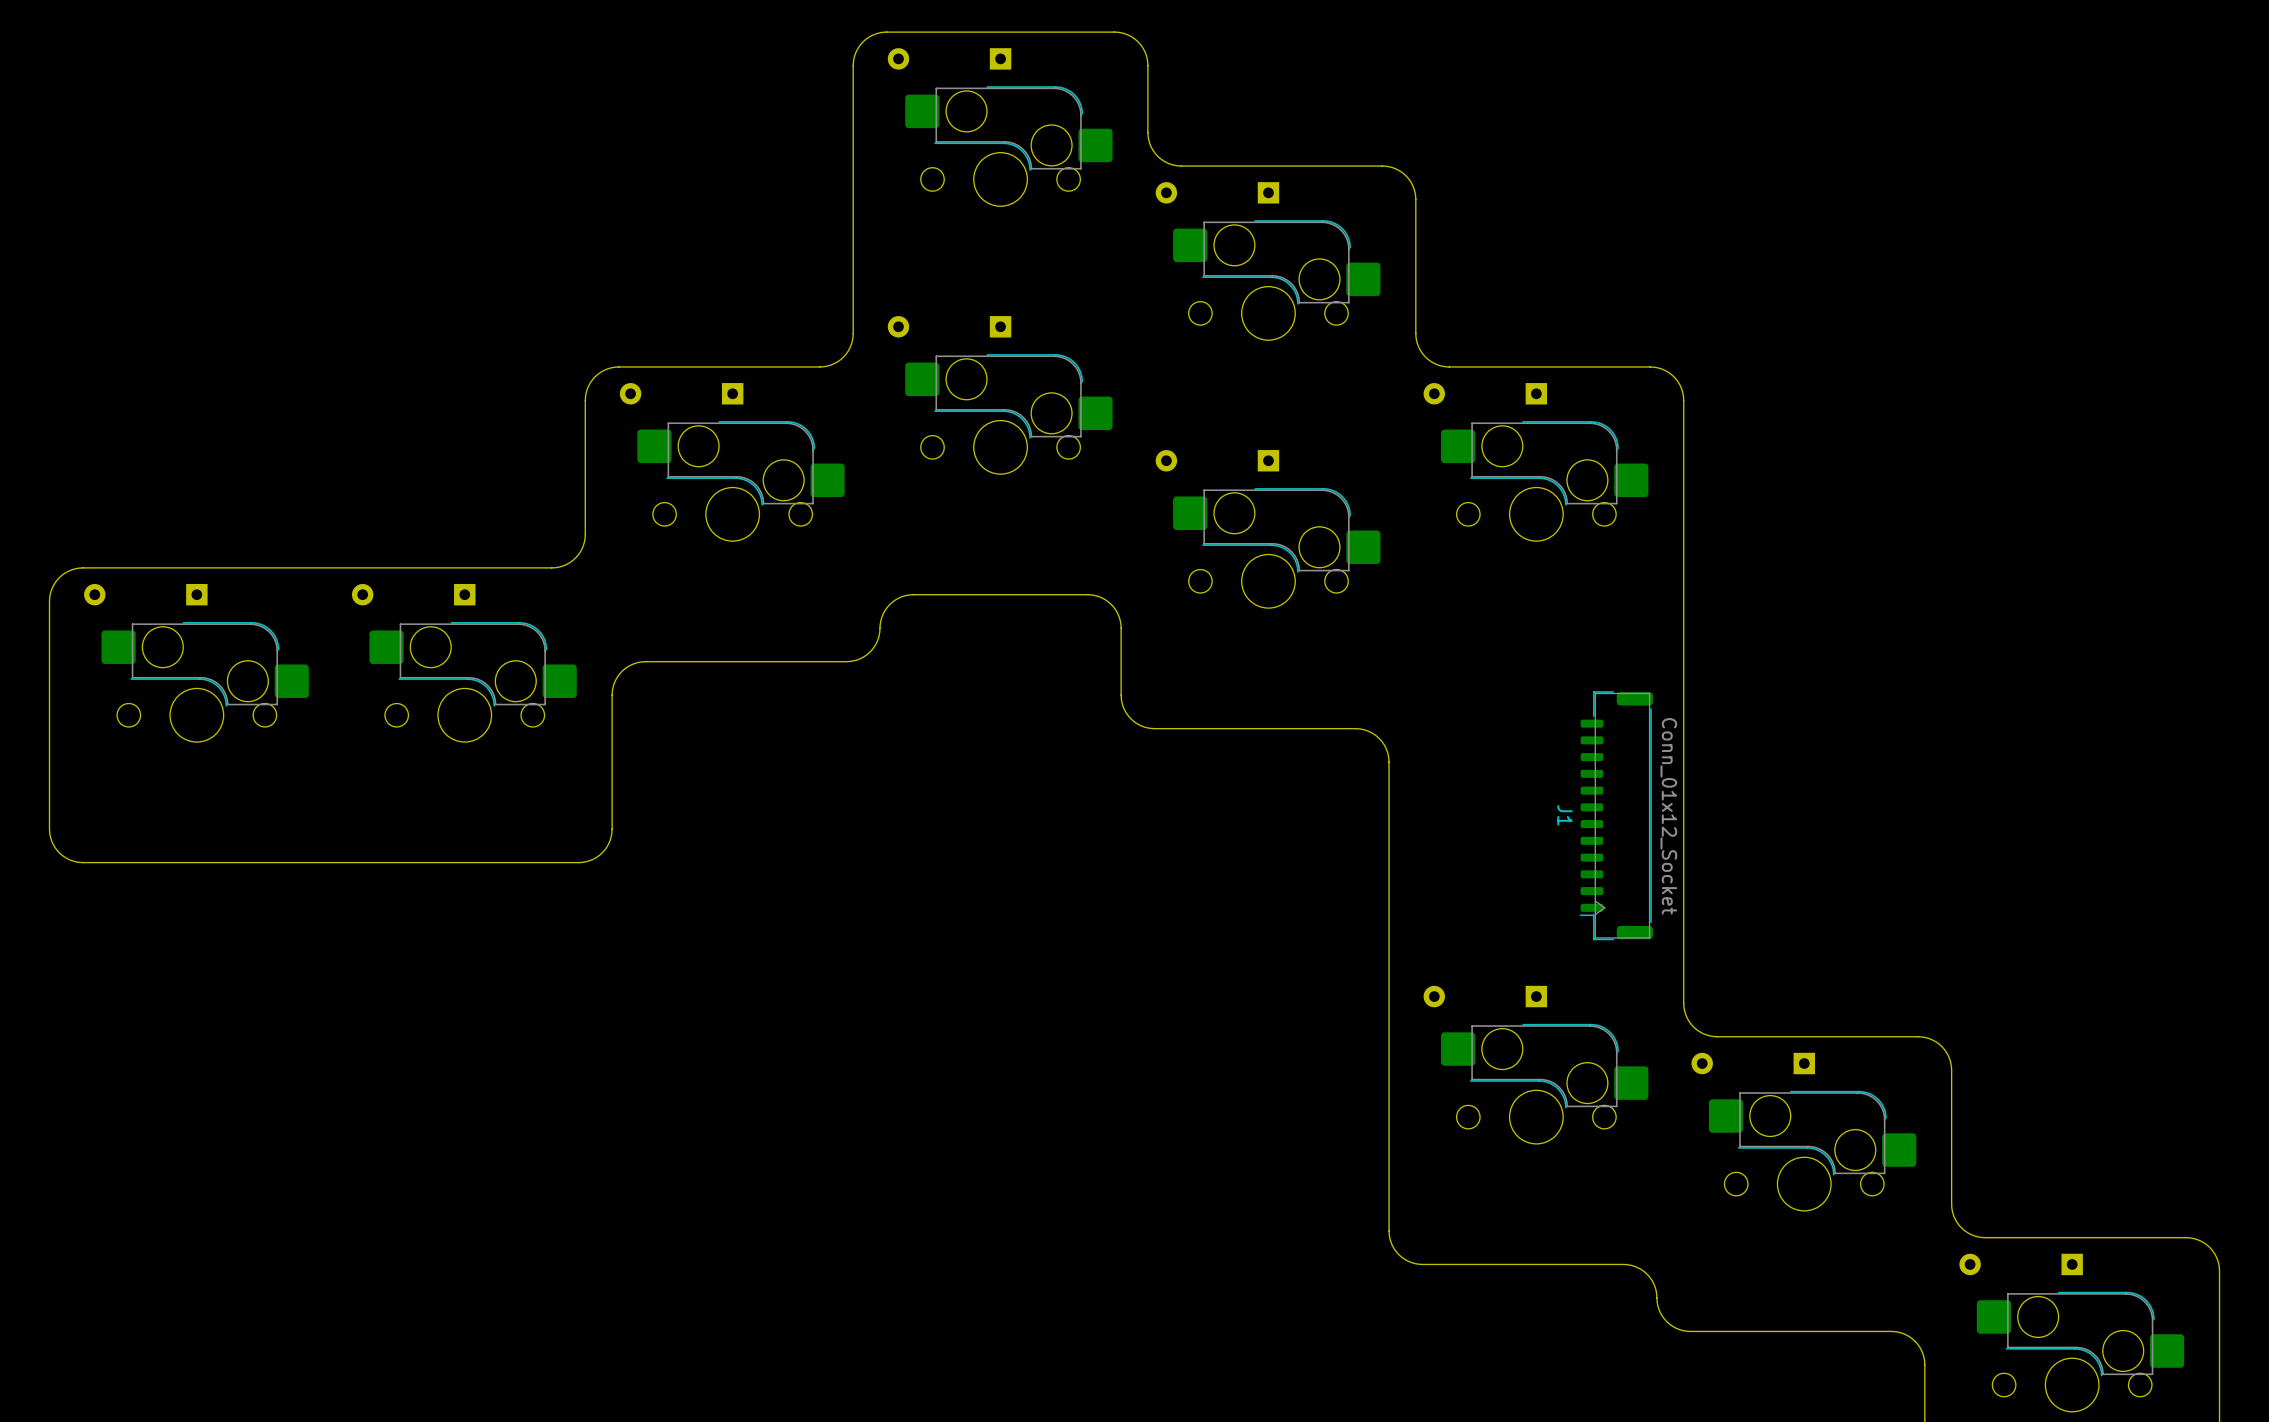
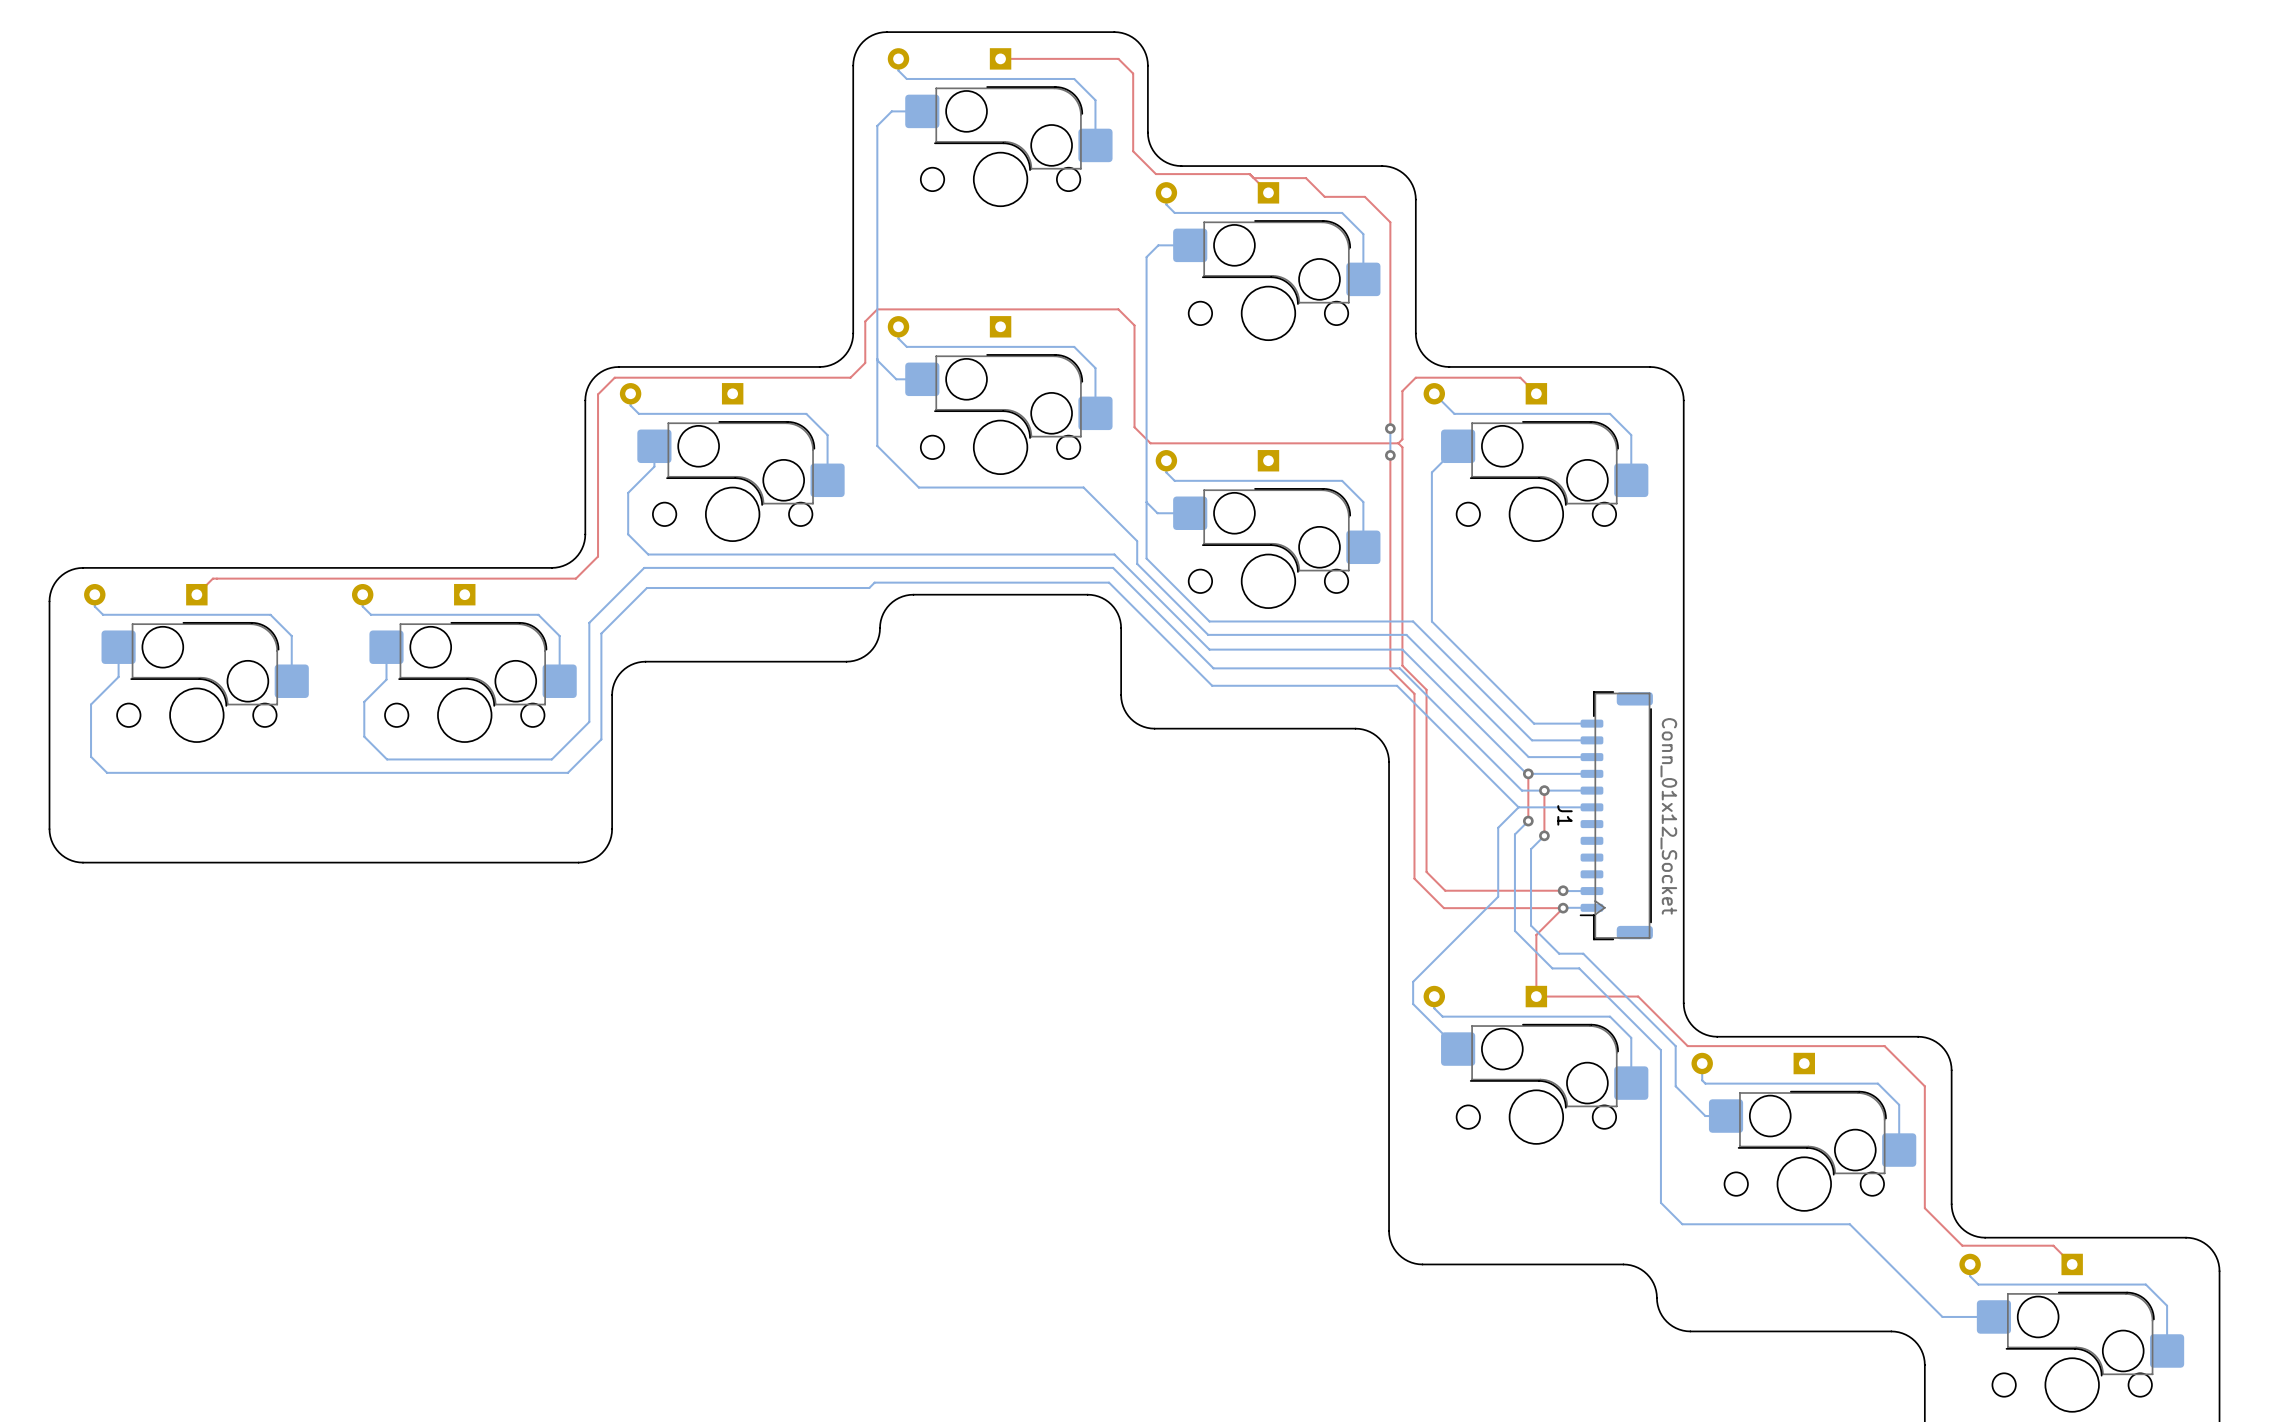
bottom track: none -> (898, 58) (898, 70) (906, 78) (1074, 78) (1095, 100) (1095, 145)
top track: none -> (1000, 58) (1118, 58) (1133, 73) (1133, 151) (1155, 174) (1249, 174) (1268, 192)
bottom track: none -> (922, 111) (891, 111) (877, 125) (877, 446) (918, 487) (1083, 487) (1137, 541) (1137, 563) (1208, 634) (1406, 634) (1528, 757) (1591, 757)
top track: none -> (1253, 178) (1305, 178) (1324, 196) (1364, 196) (1390, 222) (1390, 428)
bottom track: none -> (1166, 192) (1166, 204) (1174, 212) (1342, 212) (1363, 234) (1363, 279)
bottom track: none -> (1190, 245) (1158, 245) (1146, 257) (1146, 558) (1209, 621) (1413, 621) (1532, 740) (1591, 740)
bottom track: none -> (898, 326) (898, 338) (906, 346) (1074, 346) (1095, 368) (1095, 413)
bottom track: none -> (877, 360) (896, 379) (922, 379)
bottom track: none -> (630, 393) (630, 405) (638, 413) (806, 413) (827, 435) (827, 480)
bottom track: none -> (1434, 393) (1454, 413) (1610, 413) (1631, 435) (1631, 480)
top track: none -> (1536, 393) (1520, 377) (1415, 377) (1402, 391) (1402, 439) (1398, 443)
bottom track: none -> (1390, 428) (1390, 455)
via: none -> (1390, 428)
top track: none -> (1398, 443) (1402, 447) (1402, 665) (1426, 689) (1426, 871) (1445, 890) (1563, 890)
top track: none -> (1398, 443) (1150, 443) (1134, 427) (1134, 325) (1118, 309) (877, 309) (865, 321) (865, 362) (850, 377) (614, 377) (598, 394) (598, 556) (575, 578) (212, 578) (196, 594)
bottom track: none -> (654, 446) (654, 466) (628, 492) (628, 534) (648, 554) (1114, 554) (1209, 649) (1402, 649) (1526, 773) (1591, 773)
bottom track: none -> (1458, 446) (1431, 472) (1431, 621) (1534, 723) (1591, 723)
top track: none -> (1390, 455) (1390, 669) (1414, 693) (1414, 878) (1443, 908) (1563, 908) (1536, 934) (1536, 996) (1638, 996) (1687, 1046) (1884, 1046) (1924, 1086) (1924, 1208) (1962, 1245) (2053, 1245) (2072, 1264)
via: none -> (1390, 455)
bottom track: none -> (1166, 460) (1166, 472) (1174, 480) (1342, 480) (1363, 502) (1363, 547)
bottom track: none -> (1146, 502) (1157, 513) (1190, 513)
bottom track: none -> (94, 594) (94, 606) (103, 614) (270, 614) (291, 636) (291, 681)
bottom track: none -> (362, 594) (362, 606) (370, 614) (538, 614) (559, 636) (559, 681)
bottom track: none -> (118, 647) (118, 676) (91, 704) (91, 756) (107, 772) (567, 772) (601, 739) (601, 633) (646, 588) (869, 588) (874, 582) (1109, 582) (1212, 685) (1397, 685) (1518, 807)
bottom track: none -> (386, 647) (386, 679) (364, 701) (364, 736) (387, 759) (551, 759) (589, 721) (589, 622) (644, 567) (1113, 567) (1213, 668) (1399, 668) (1521, 790) (1591, 790)
top track: none -> (1528, 773) (1528, 821)
via: none -> (1528, 773)
top track: none -> (1544, 790) (1544, 835)
via: none -> (1544, 790)
bottom track: none -> (1518, 807) (1498, 827) (1498, 896) (1413, 981) (1413, 1004) (1458, 1049)
bottom track: none -> (1591, 807) (1518, 807)
bottom track: none -> (1528, 821) (1514, 834) (1514, 930) (1552, 968) (1579, 968) (1660, 1050) (1660, 1202) (1682, 1224) (1849, 1224) (1942, 1316) (1993, 1316)
via: none -> (1528, 821)
bottom track: none -> (1544, 835) (1531, 849) (1531, 925) (1559, 953) (1583, 953) (1675, 1046) (1675, 1086) (1705, 1116) (1726, 1116)
via: none -> (1544, 835)
bottom track: none -> (1563, 890) (1591, 891)
via: none -> (1563, 890)
bottom track: none -> (1591, 907) (1563, 908)
via: none -> (1563, 908)
bottom track: none -> (1434, 996) (1434, 1008) (1442, 1016) (1610, 1016) (1631, 1037) (1631, 1083)
bottom track: none -> (1702, 1063) (1702, 1080) (1705, 1083) (1877, 1083) (1899, 1104) (1899, 1150)
bottom track: none -> (1970, 1264) (1970, 1276) (1978, 1284) (2145, 1284) (2167, 1305) (2167, 1350)

